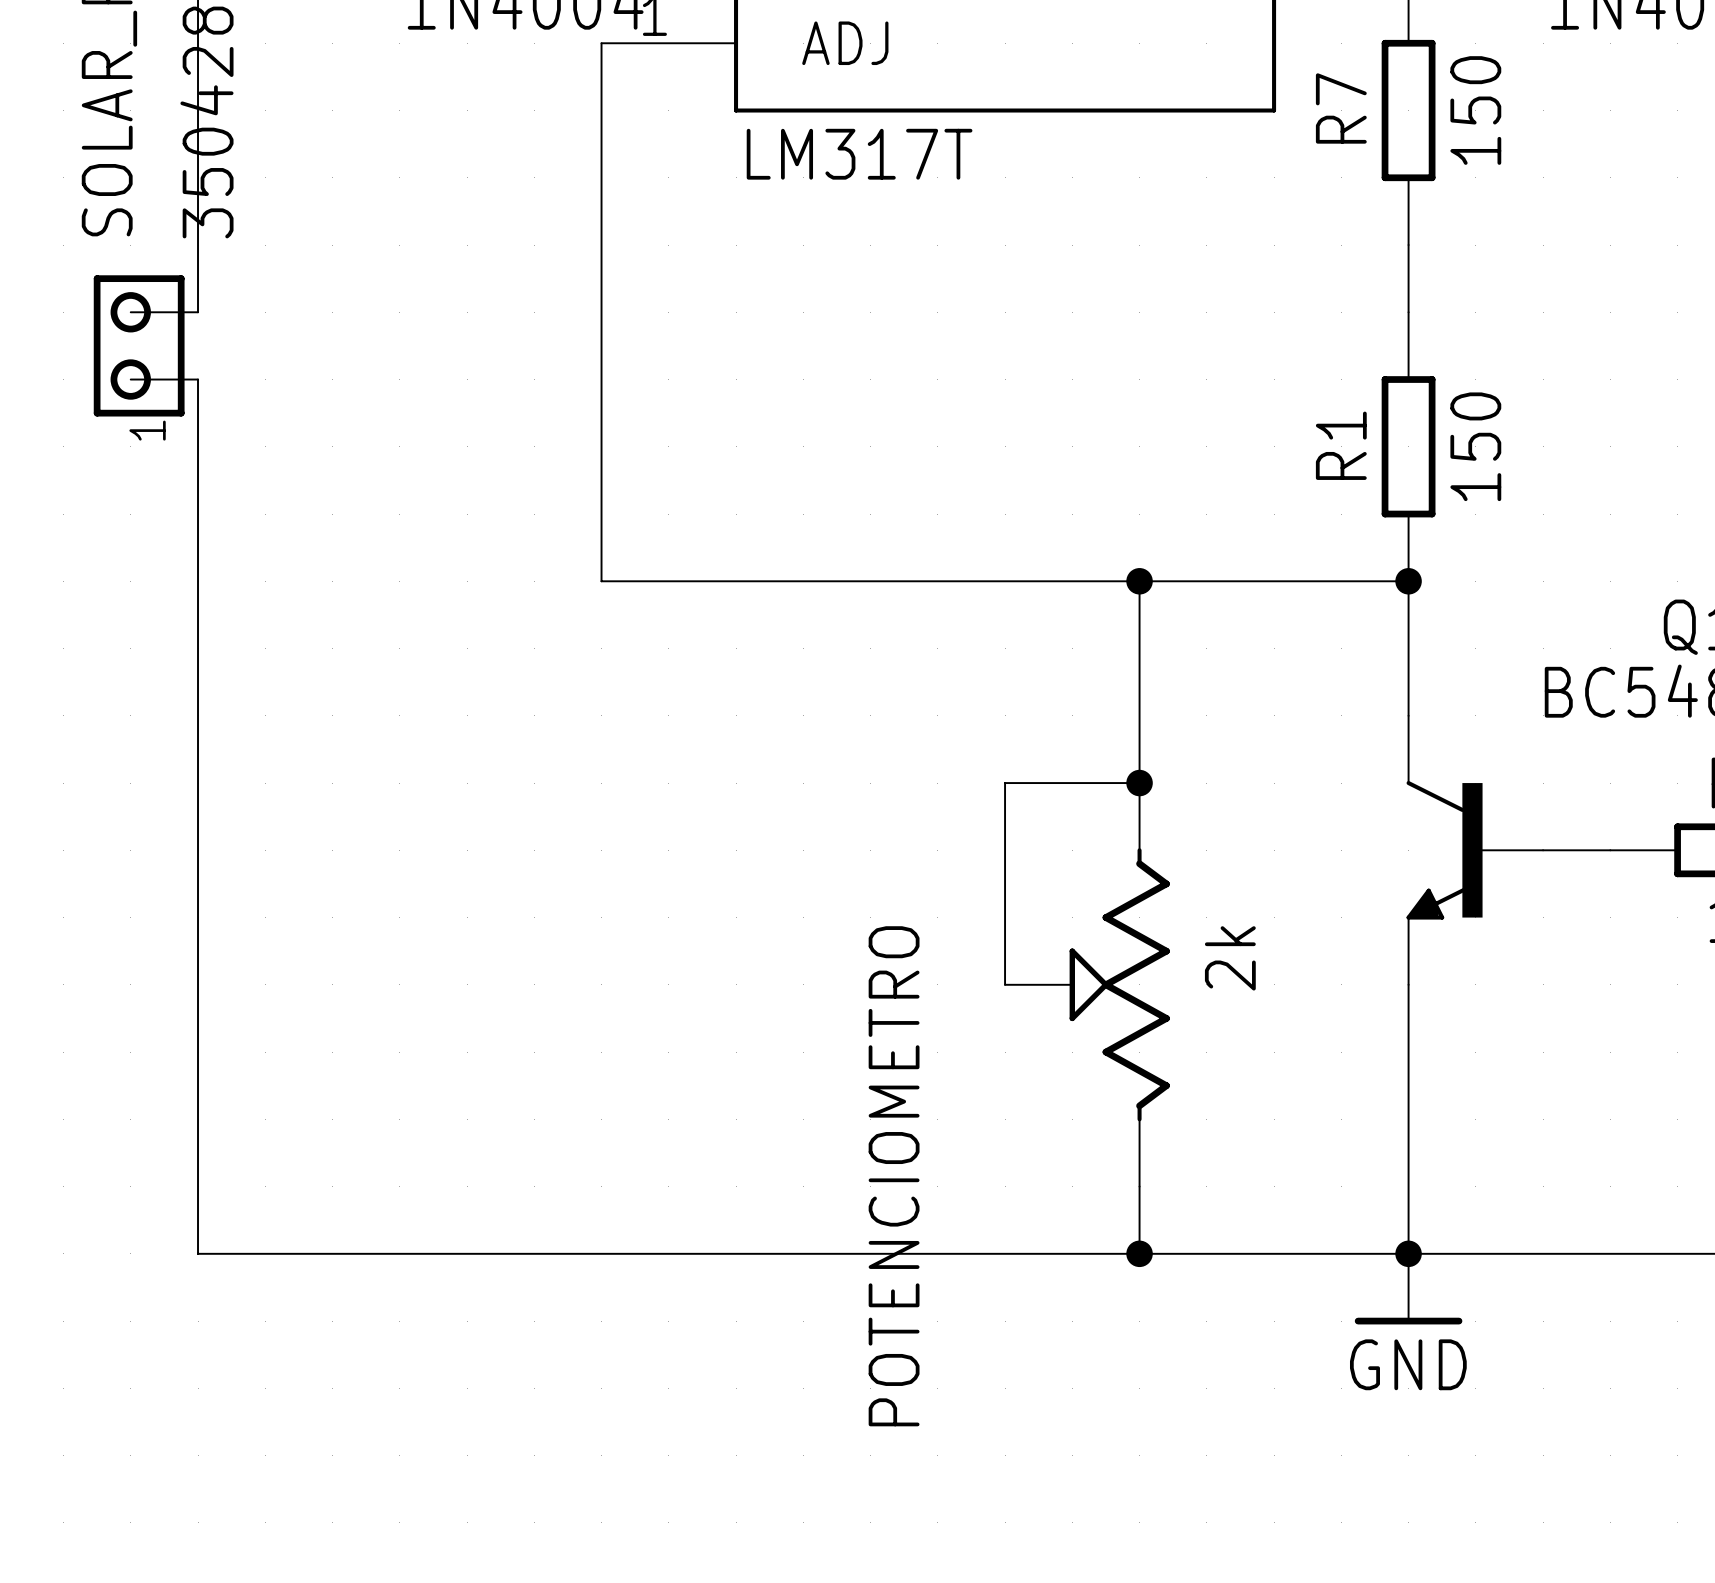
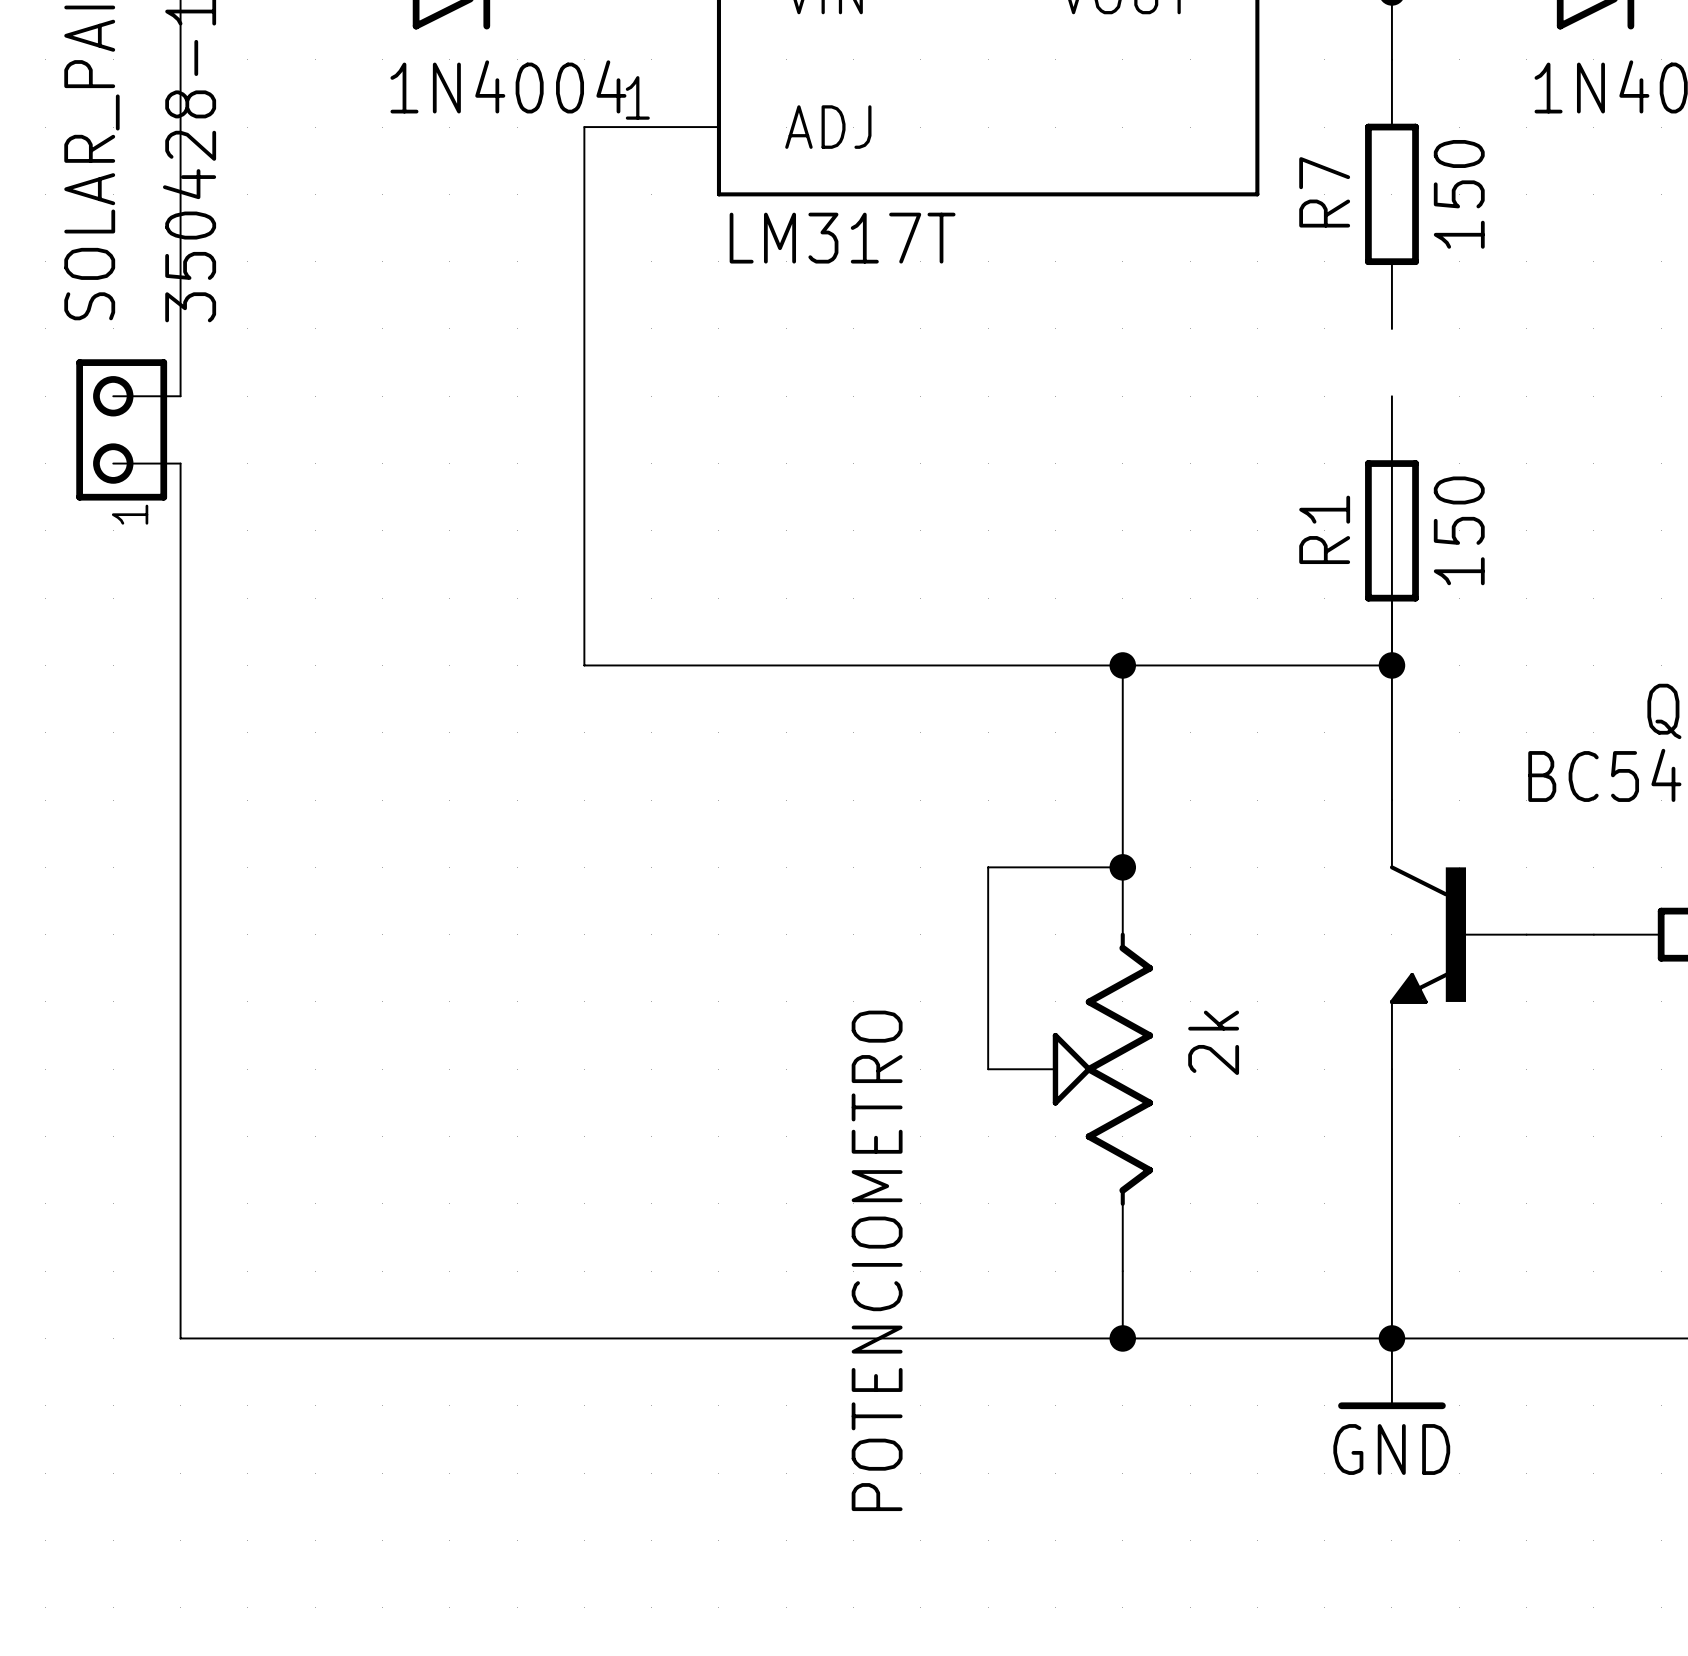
wire: (1408, 245) (1408, 312) -> none
wire: none -> (1391, 463) (1391, 665)

